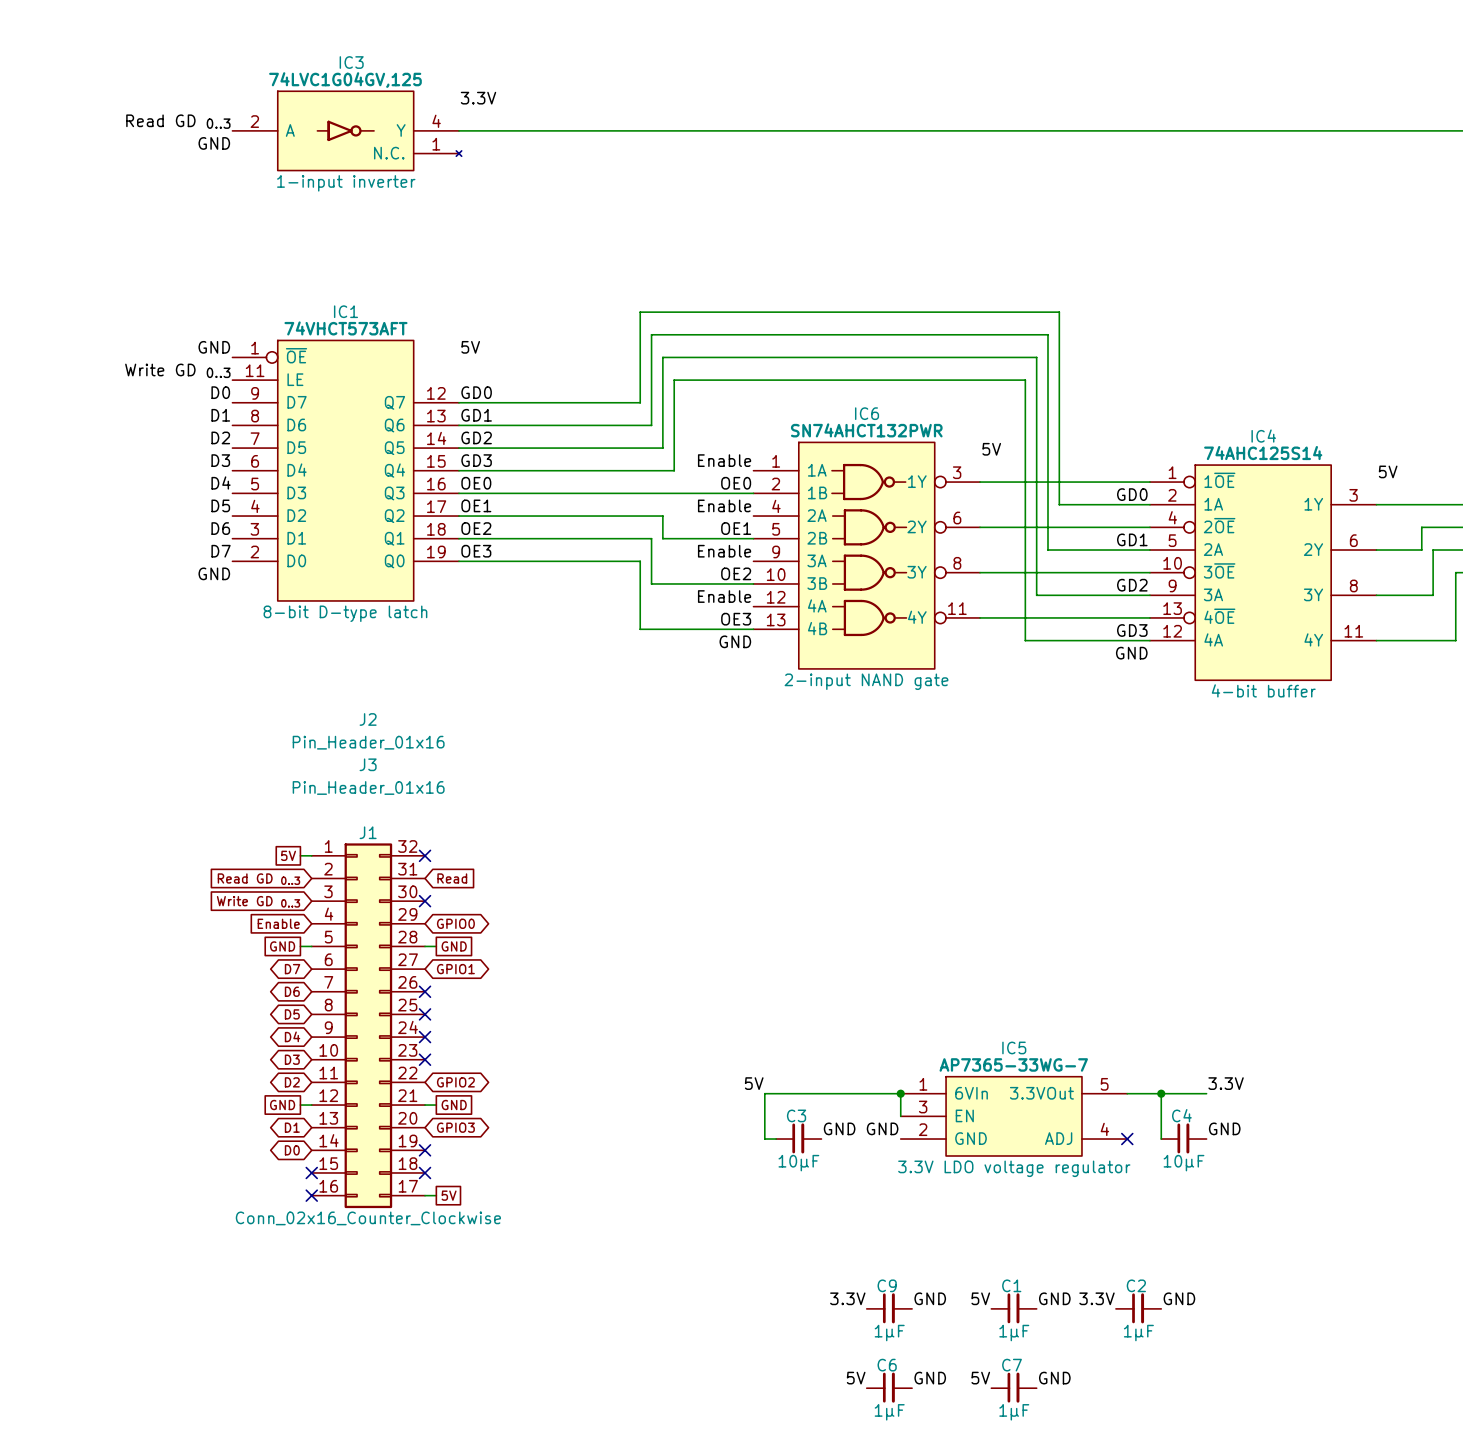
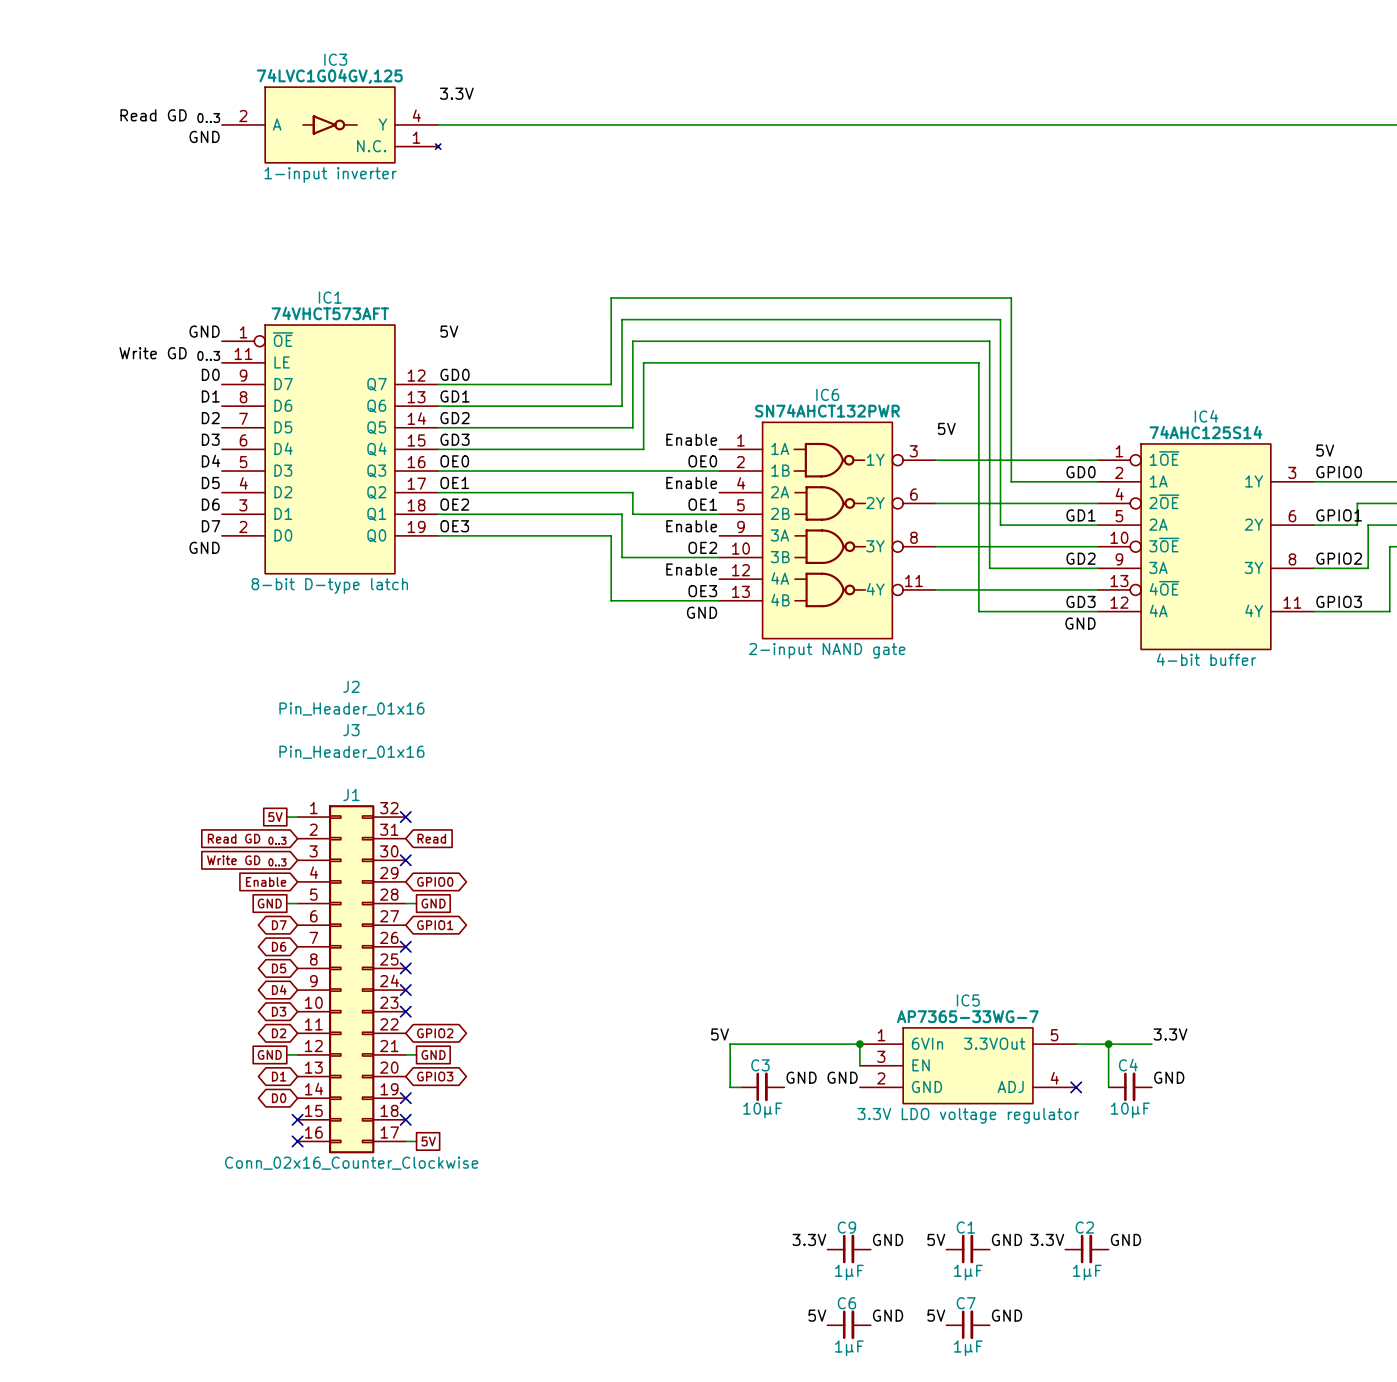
label: none -> GPIO0 (1339, 472)
label: none -> GPIO1 (1339, 515)
label: none -> GPIO2 (1339, 558)
label: none -> GPIO3 (1339, 601)

